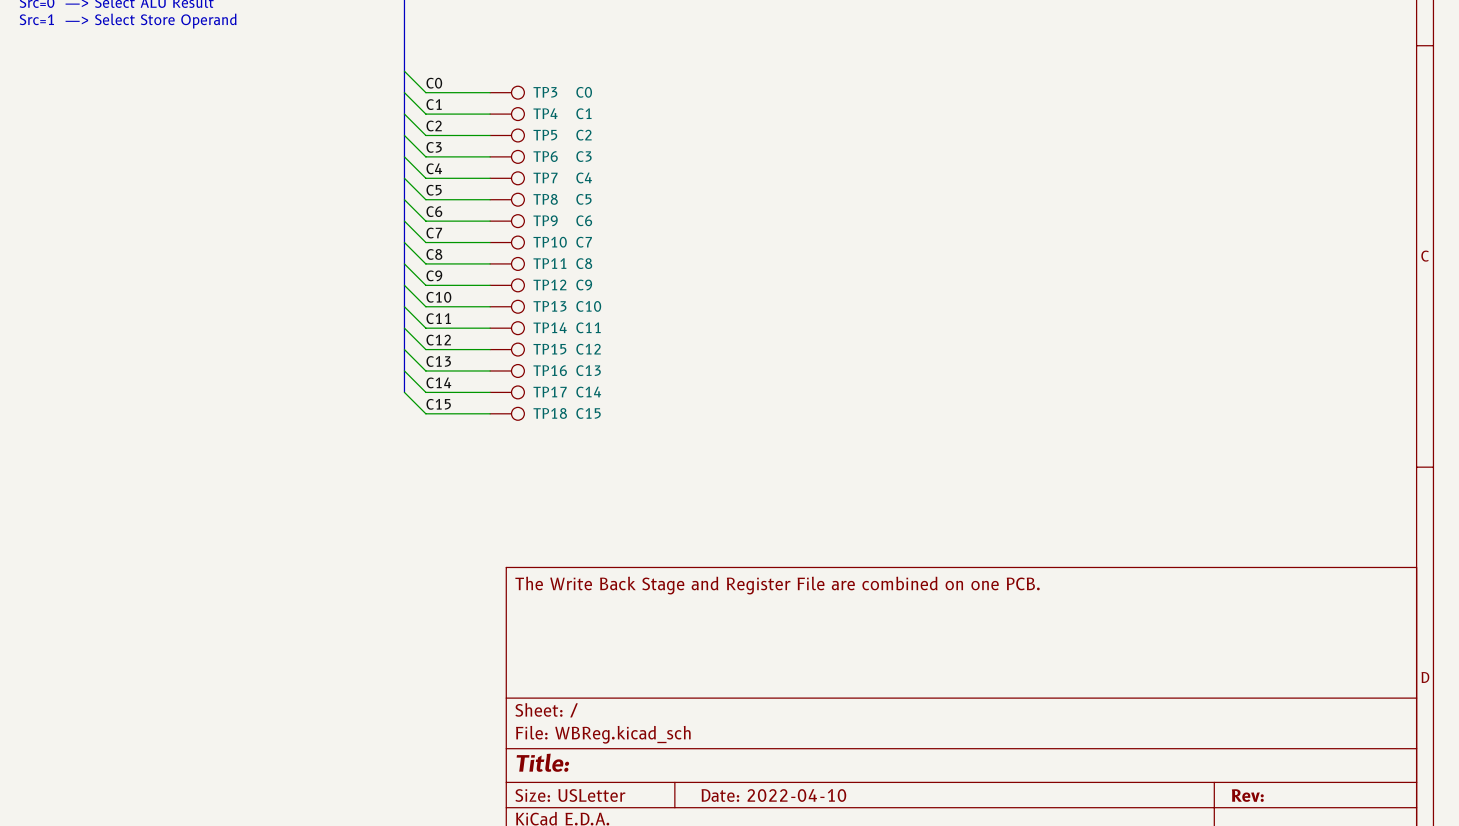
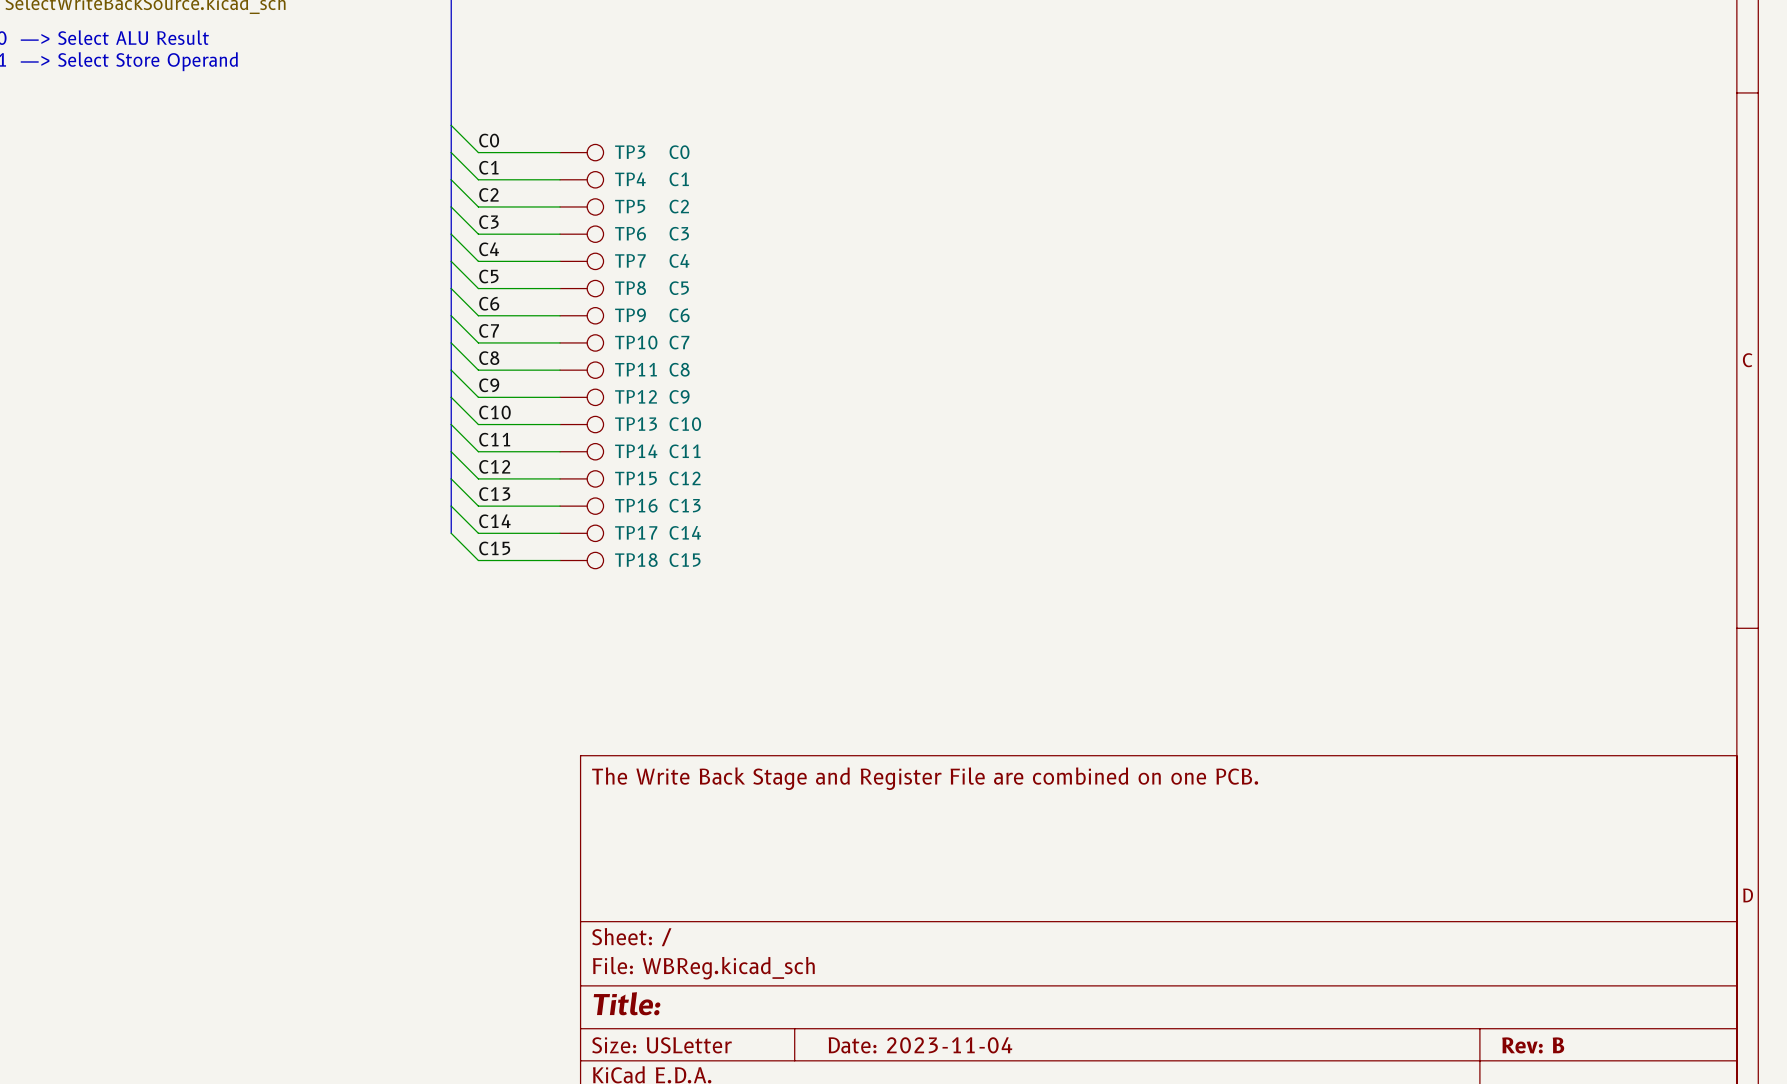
title block: Date: 2022-04-10 (773, 795) -> Date: 2023-11-04 (920, 1045)
title block: Rev: (1247, 795) -> Rev: B (1533, 1045)

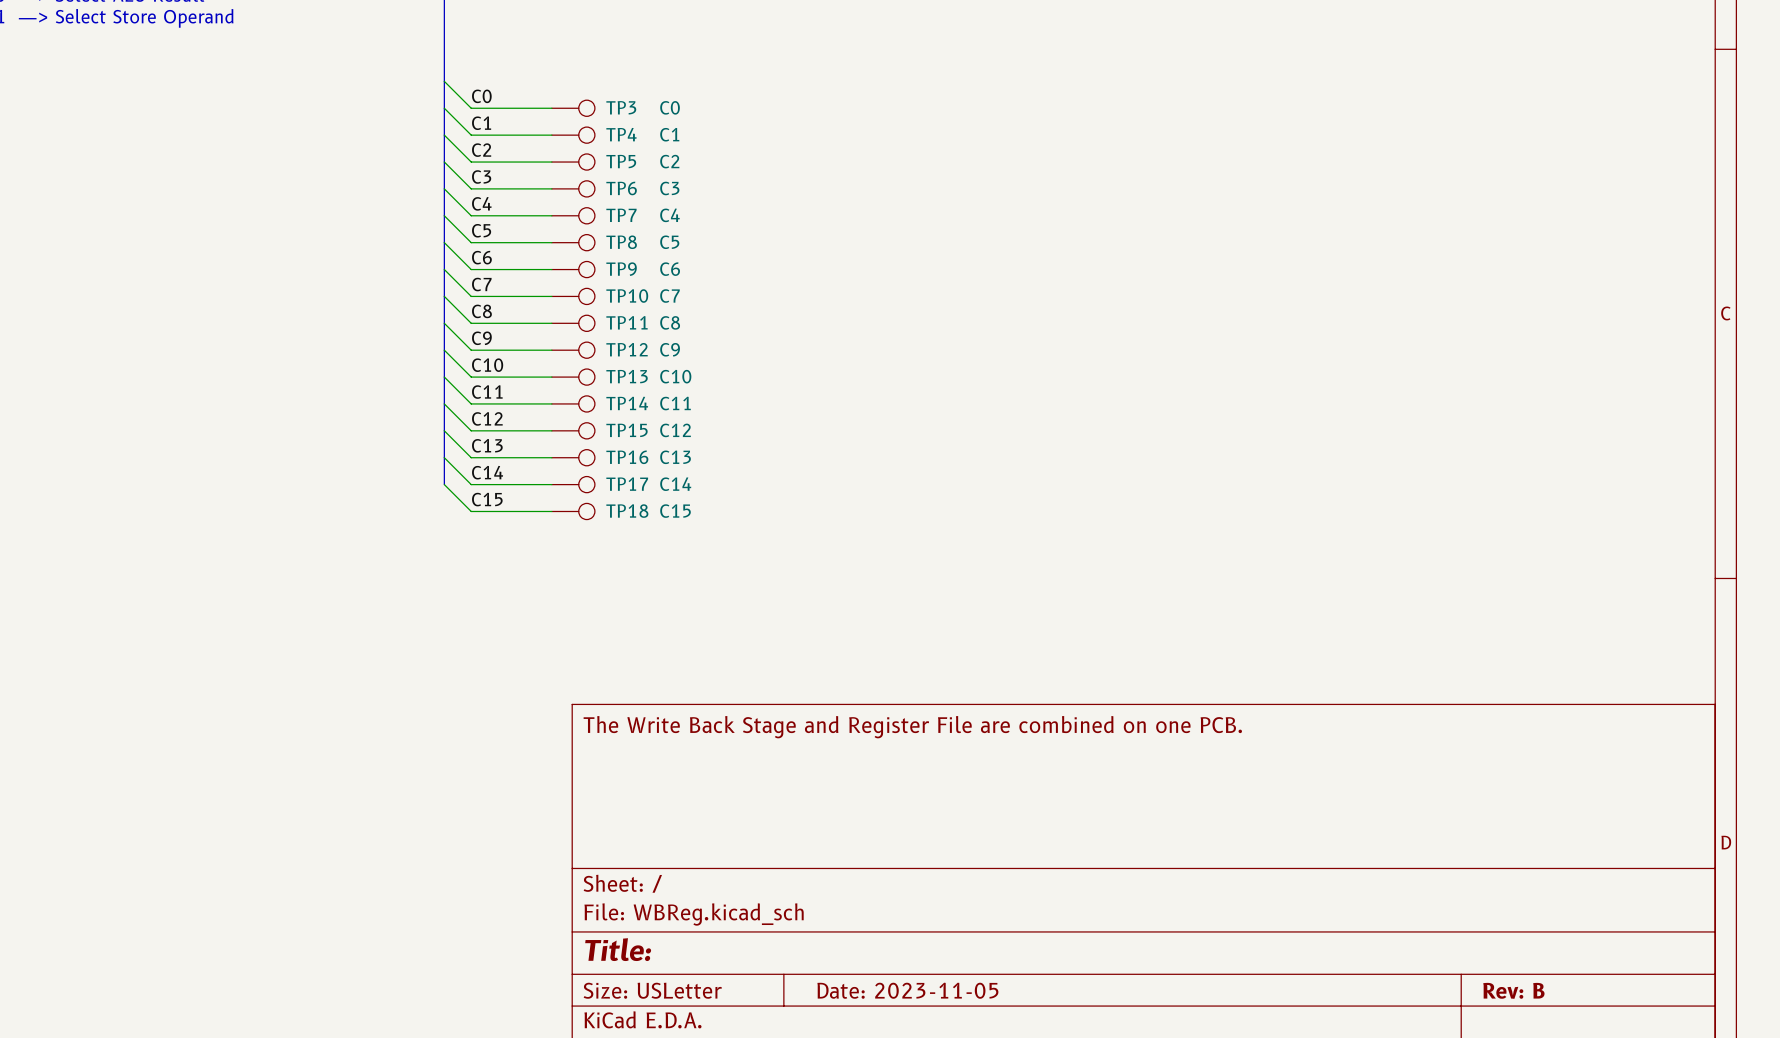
title block: Date: 2023-11-04 (920, 1045) -> Date: 2023-11-05 (907, 990)

